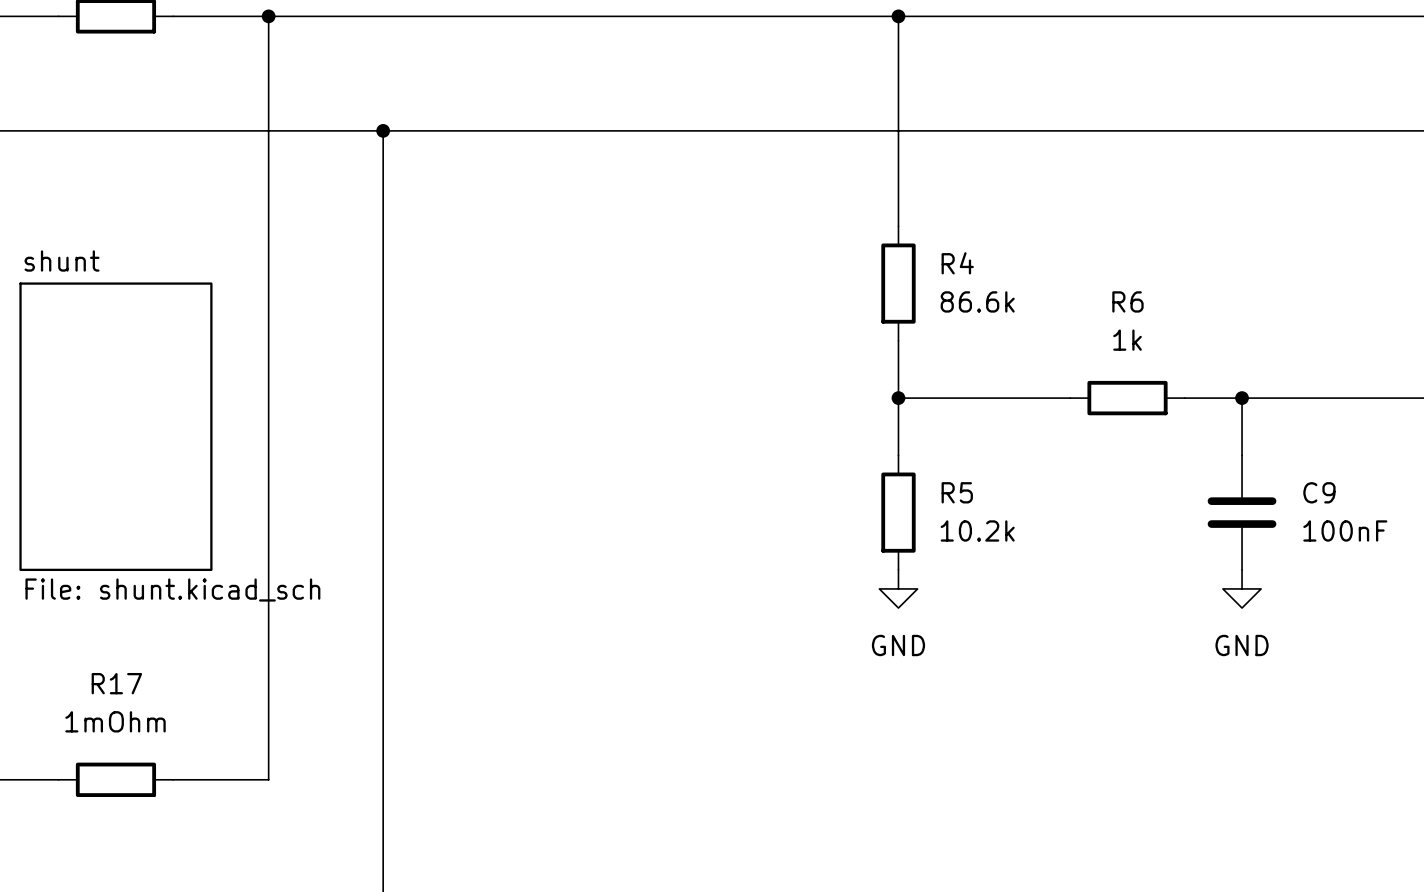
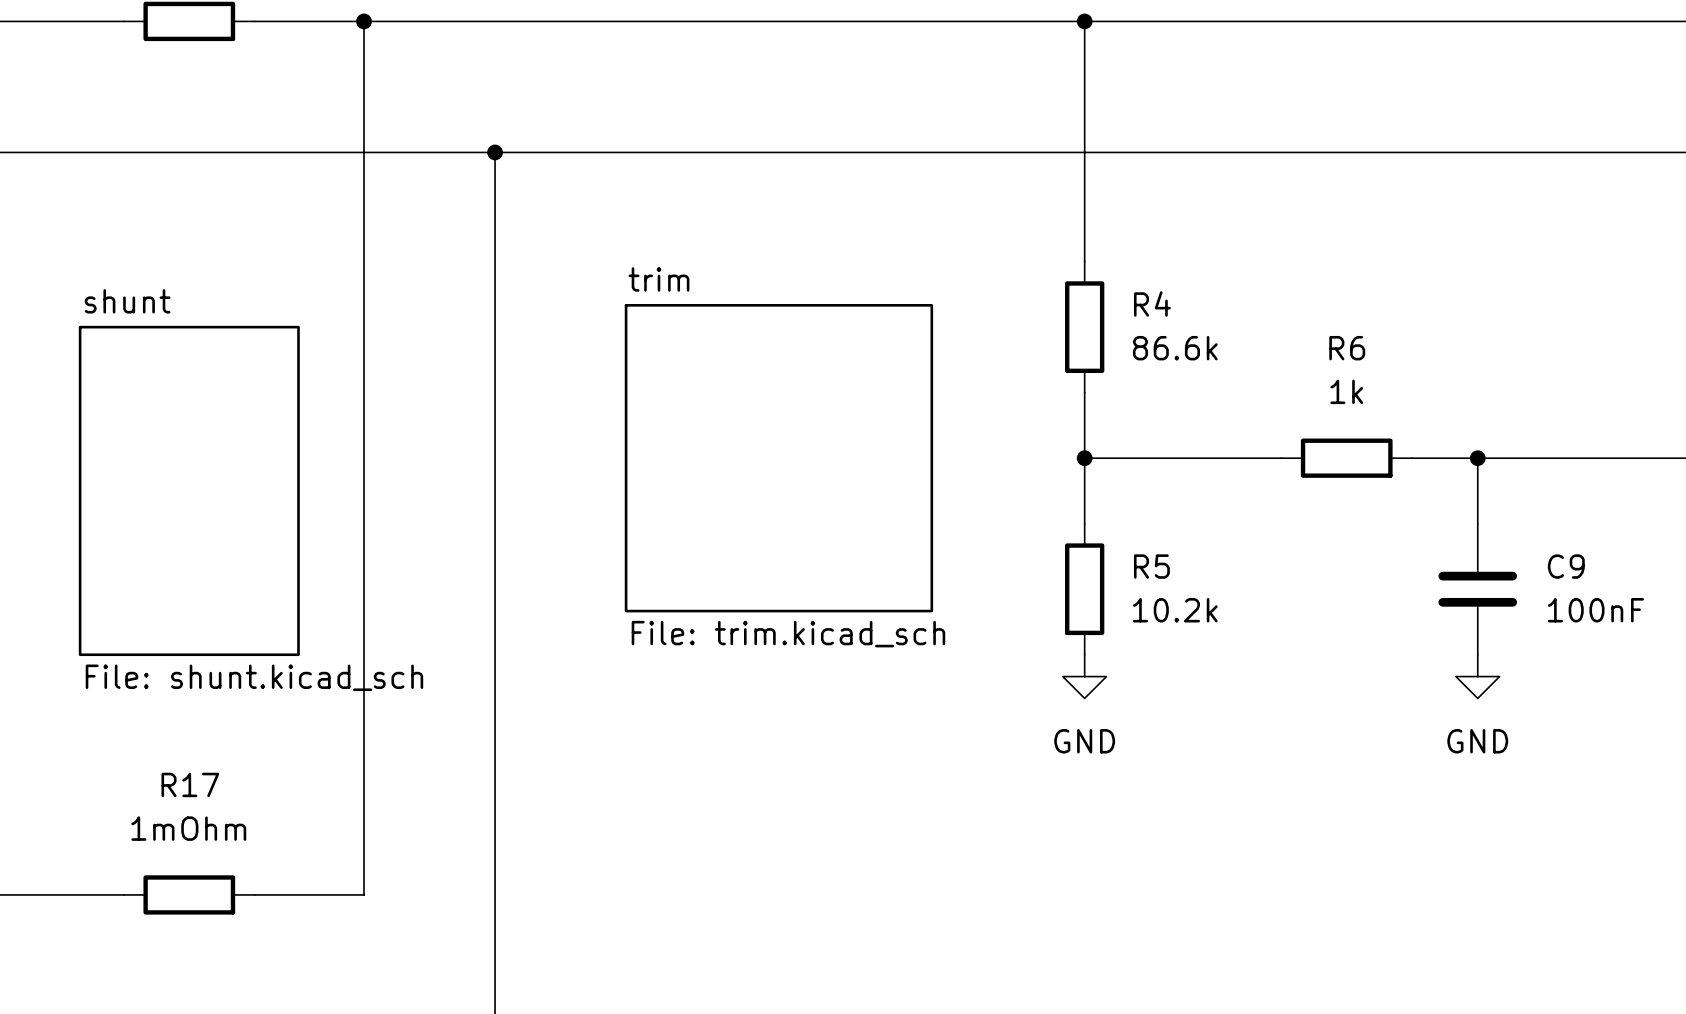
sheet trim: none -> File: trim.kicad_sch (778, 458)

